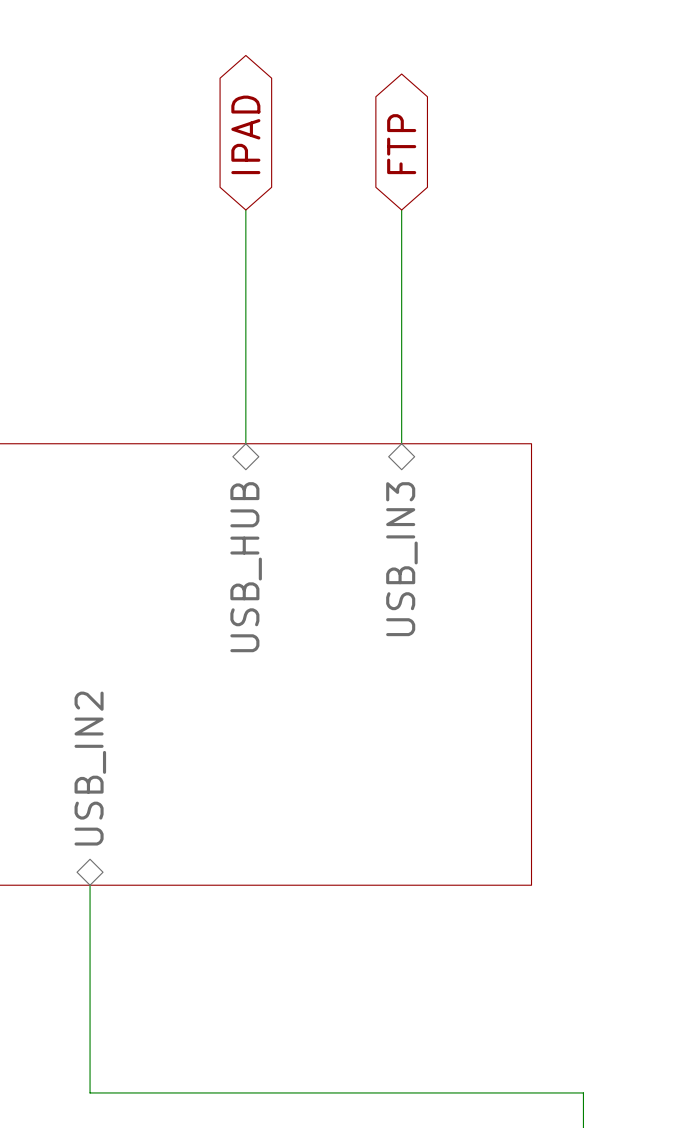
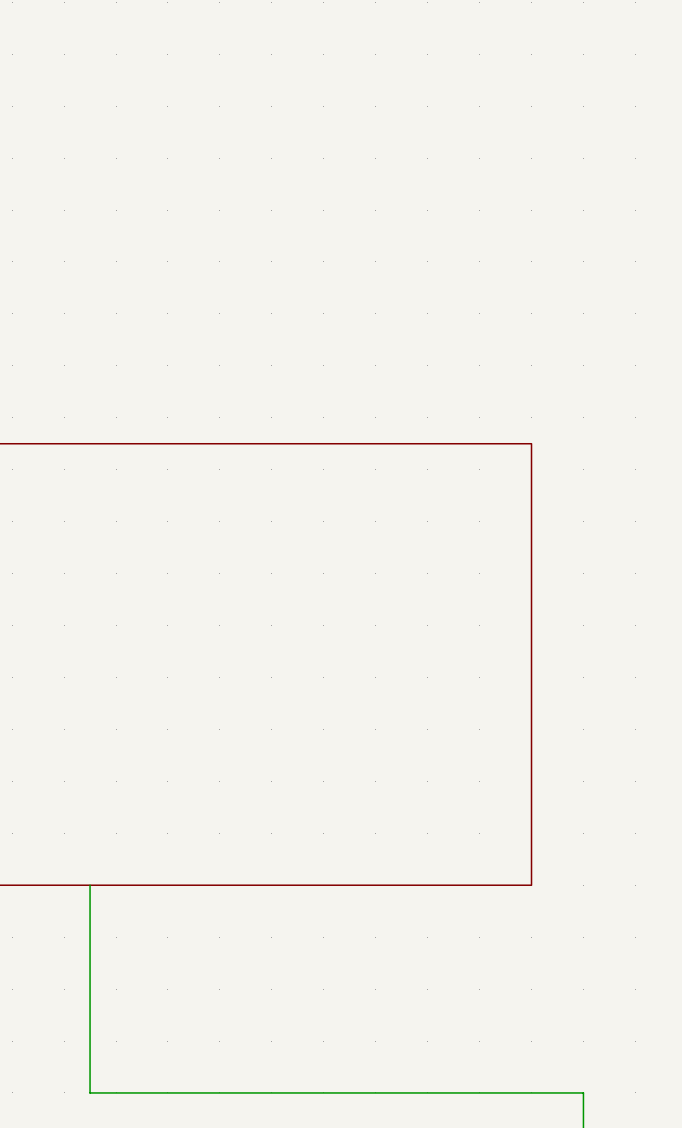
global label: IPAD (245, 134) -> none
global label: FTP (401, 144) -> none
wire: (245, 210) (245, 443) -> none
wire: (401, 210) (401, 443) -> none
sheet pin: USB_IN3 (401, 559) -> none
sheet pin: USB_HUB (246, 567) -> none
sheet pin: USB_IN2 (90, 768) -> none

